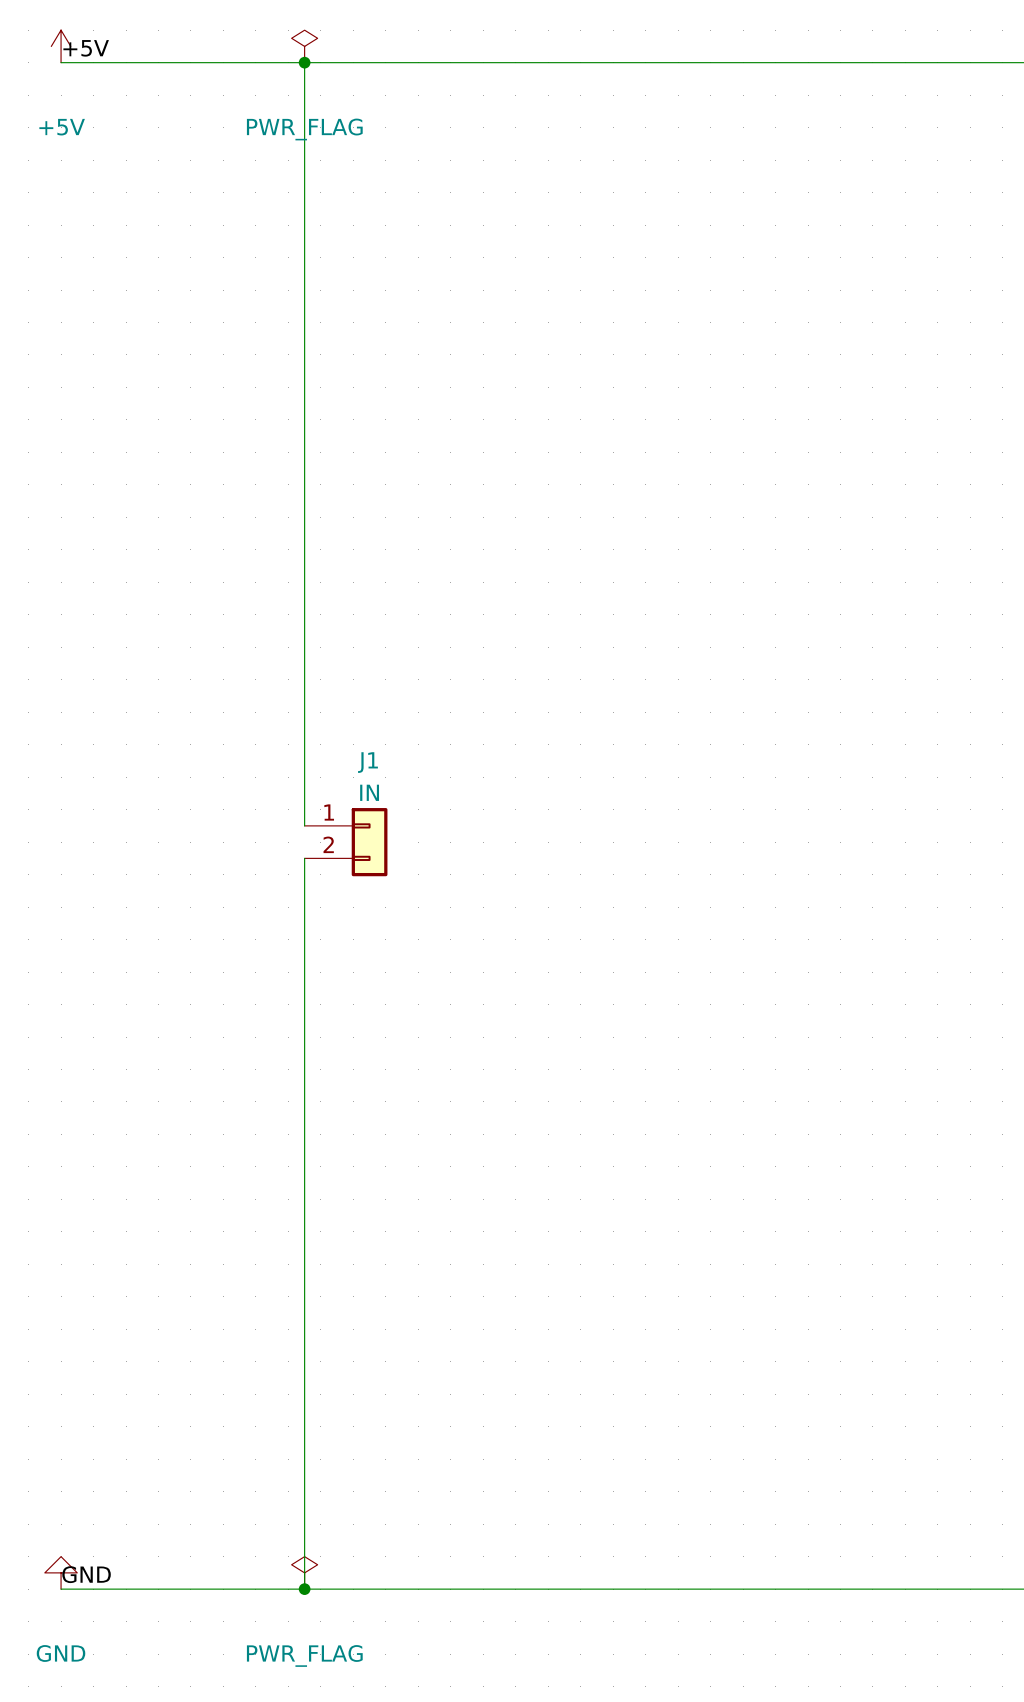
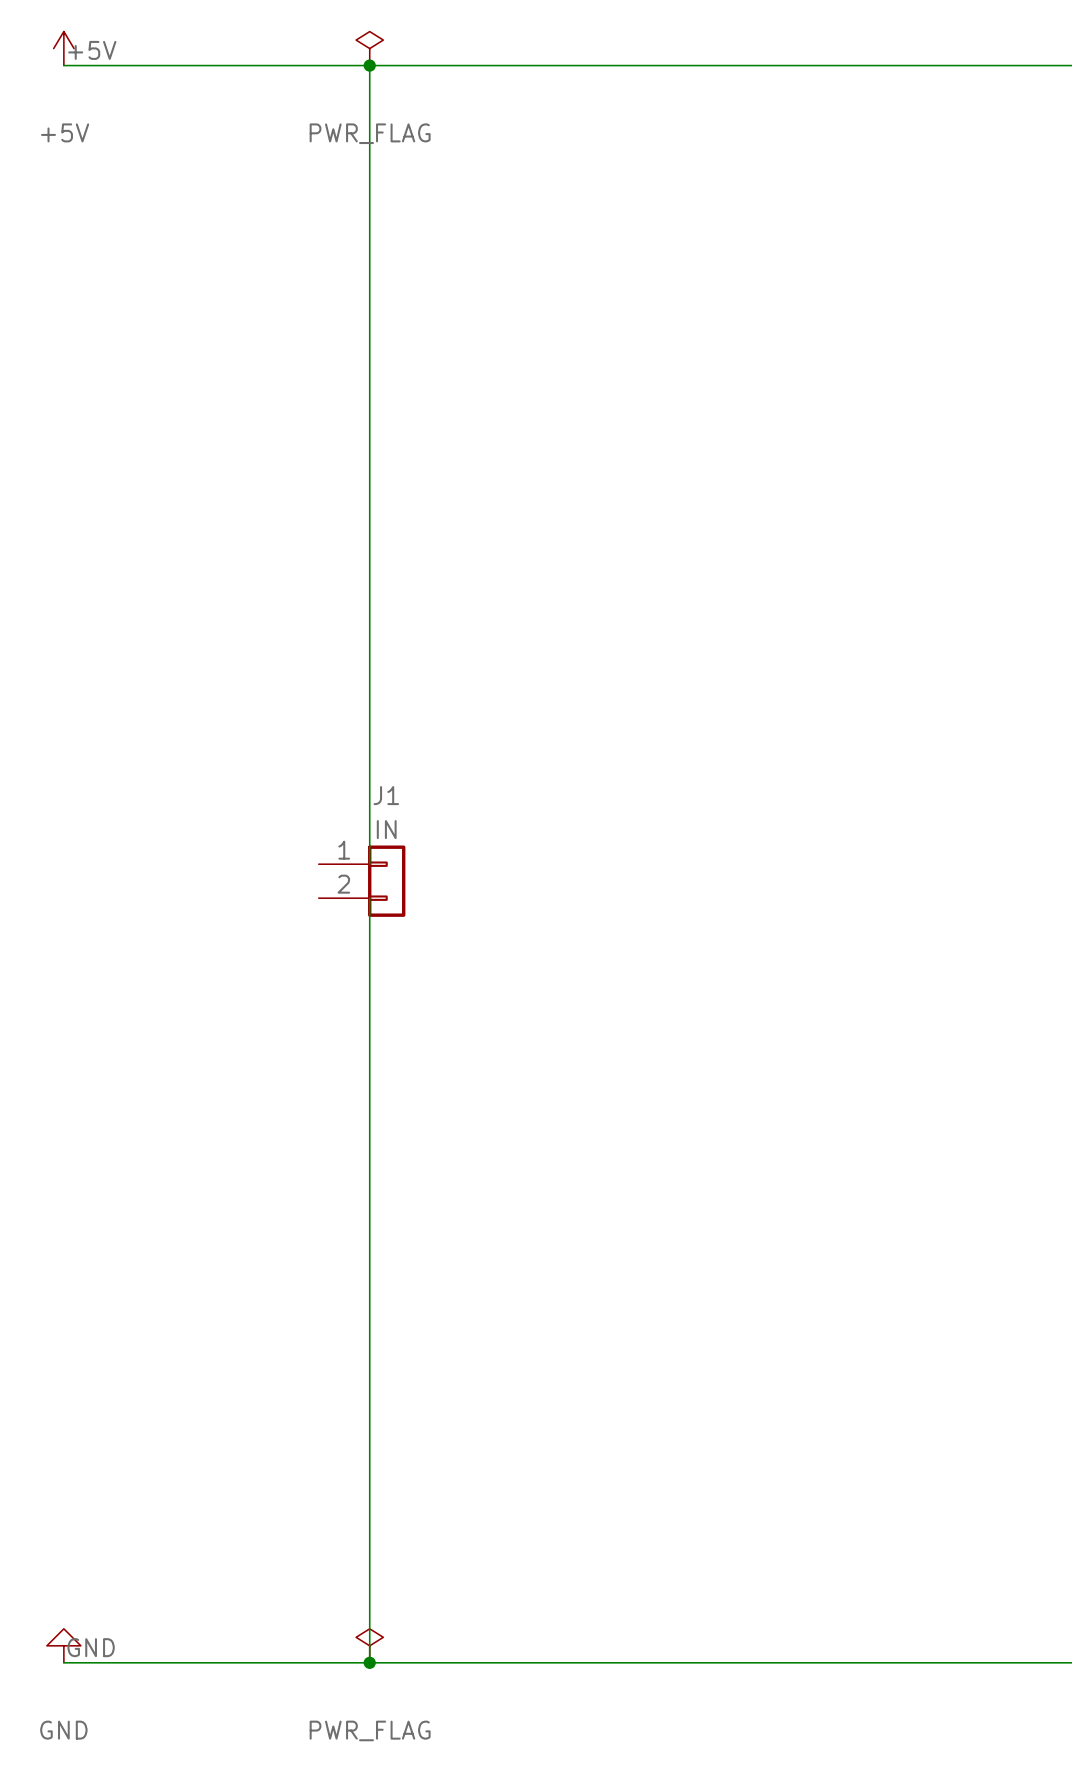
power symbol position: PWR_FLAG (304, 46) -> PWR_FLAG (369, 48)
wire: (304, 62) (304, 825) -> (369, 65) (369, 864)
junction position: (304, 62) -> (369, 65)
wire: (304, 858) (304, 1589) -> (369, 898) (369, 1662)
power symbol position: PWR_FLAG (304, 1572) -> PWR_FLAG (369, 1645)
junction position: (304, 1589) -> (369, 1662)

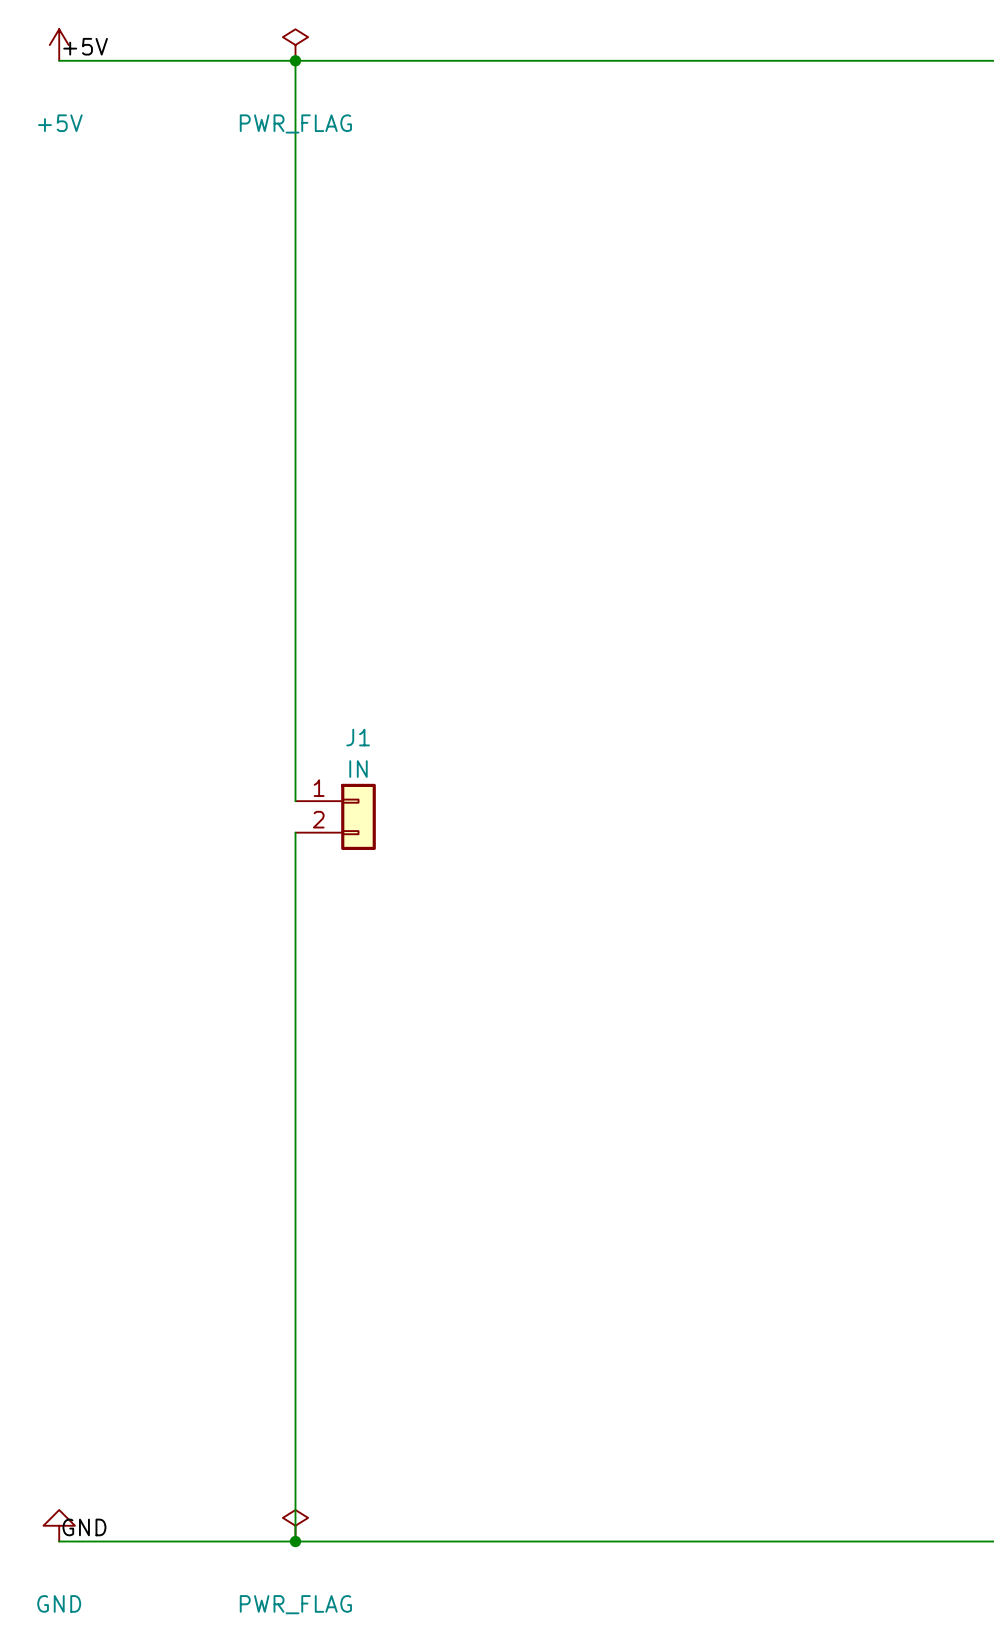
power symbol position: PWR_FLAG (369, 48) -> PWR_FLAG (295, 45)
wire: (369, 65) (369, 864) -> (295, 60) (295, 801)
junction position: (369, 65) -> (295, 60)
wire: (369, 898) (369, 1662) -> (295, 832) (295, 1541)
power symbol position: PWR_FLAG (369, 1645) -> PWR_FLAG (295, 1525)
junction position: (369, 1662) -> (295, 1541)

